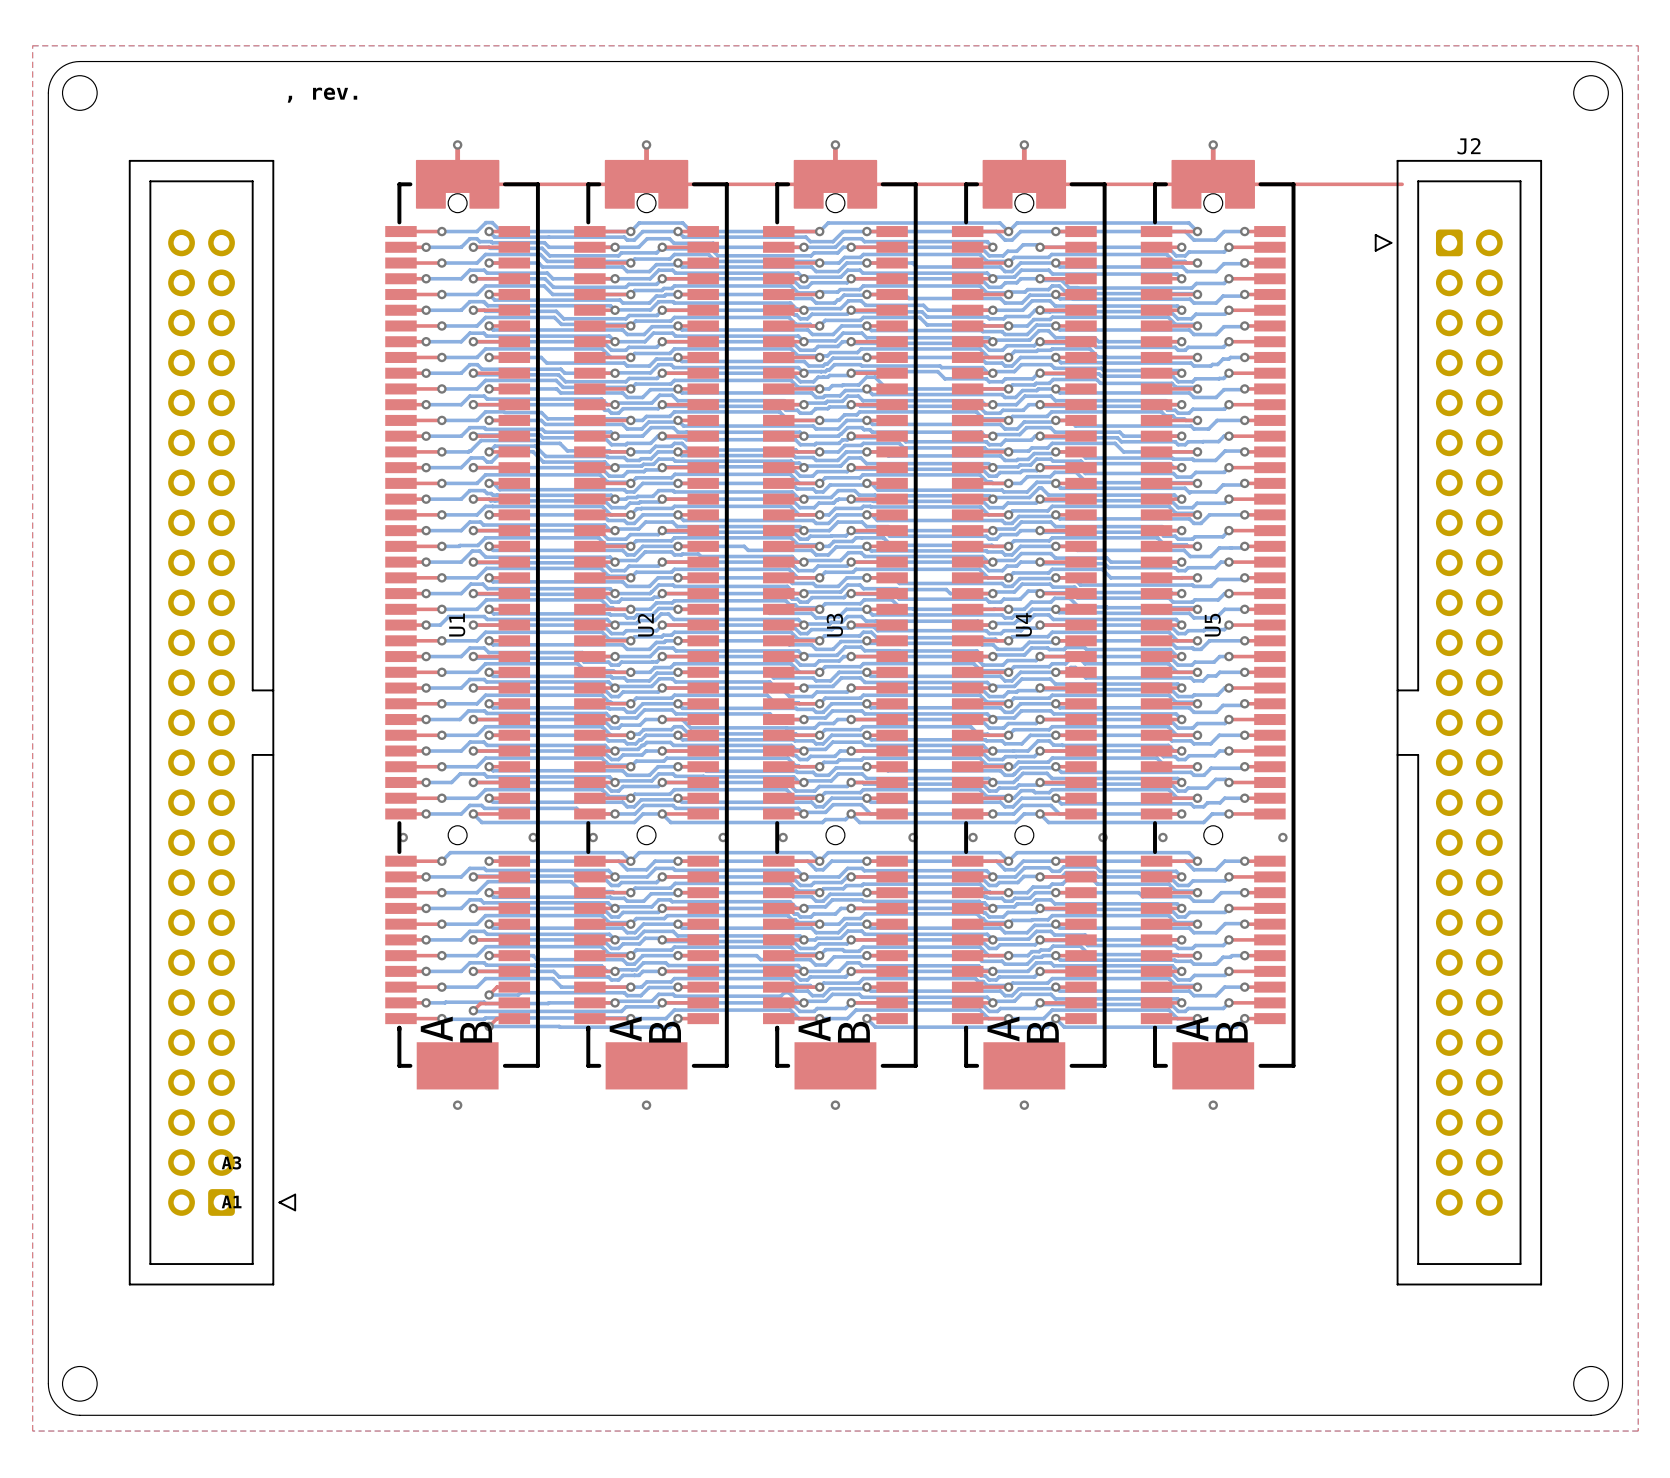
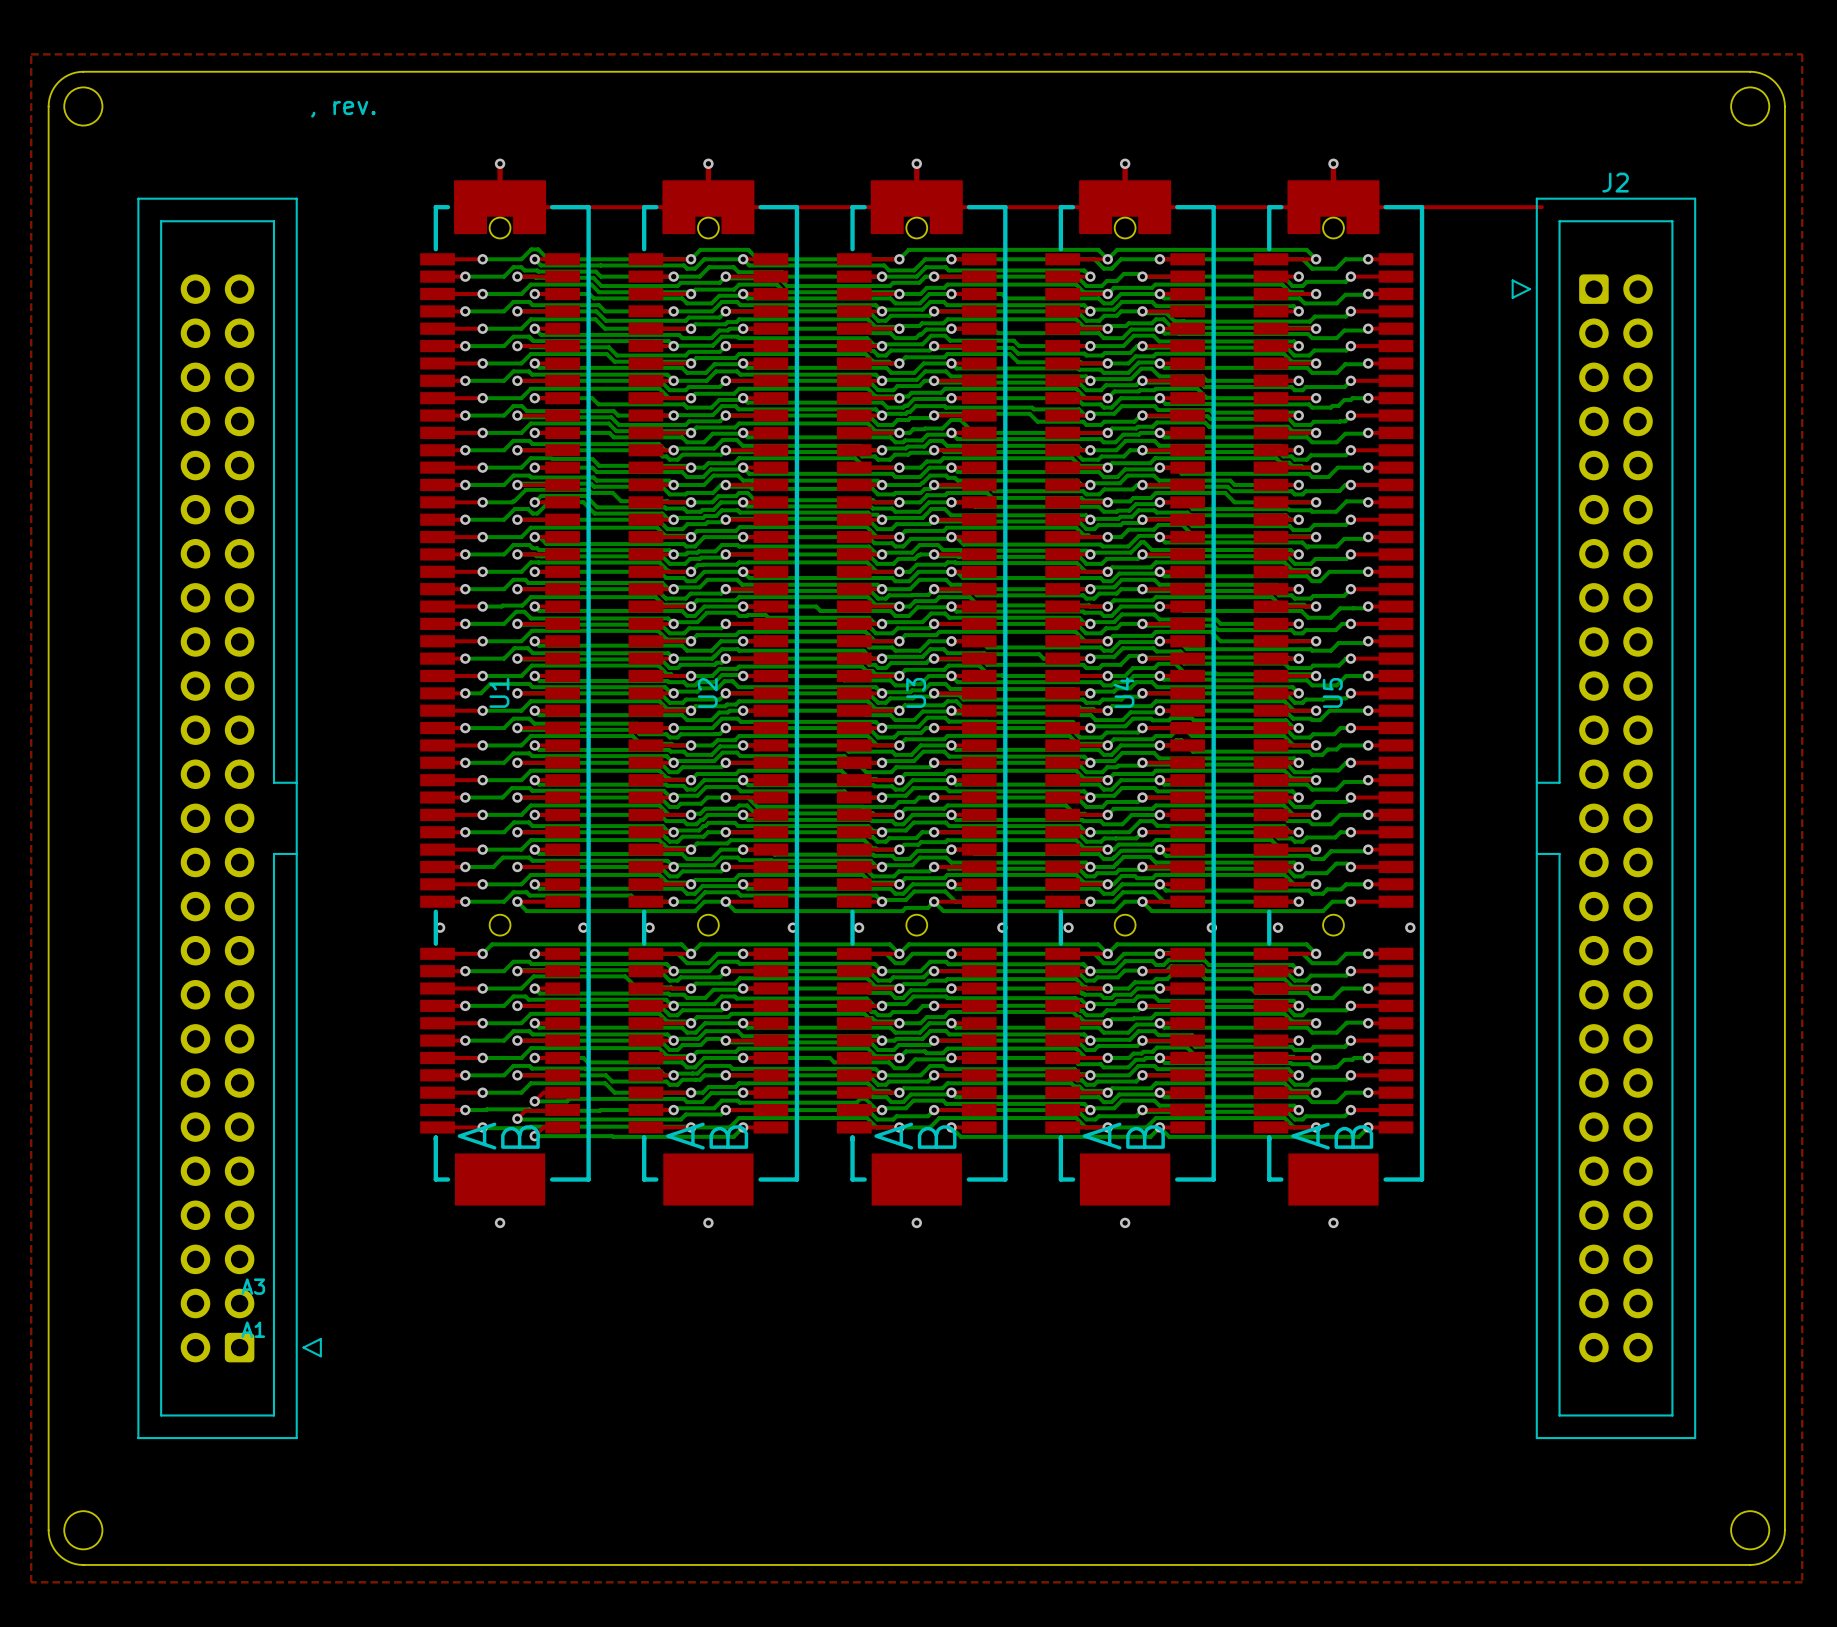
part position: (212, 722) -> (229, 818)
J2 position: (1458, 722) -> (1603, 818)

